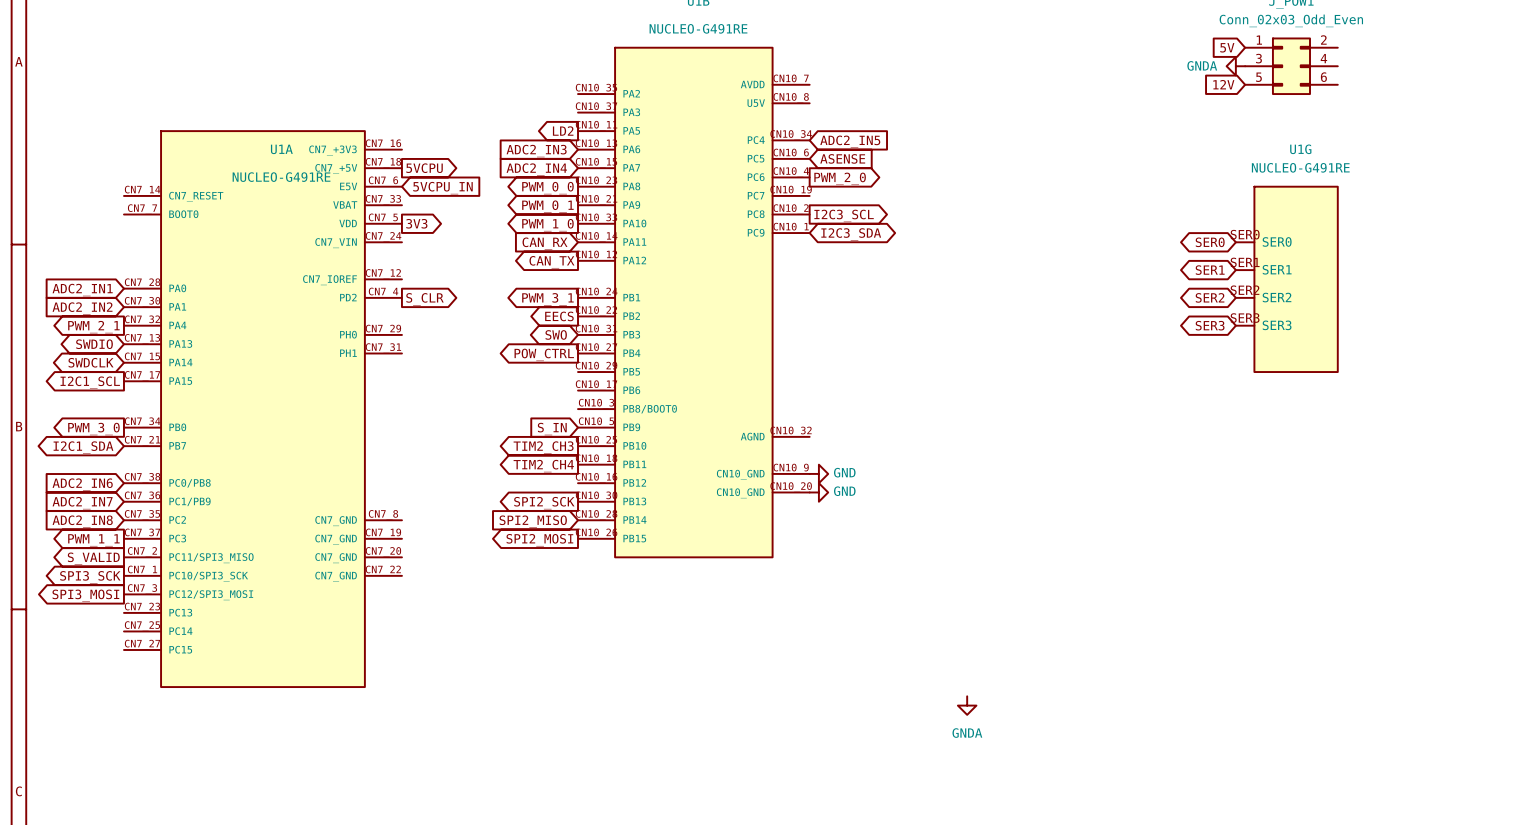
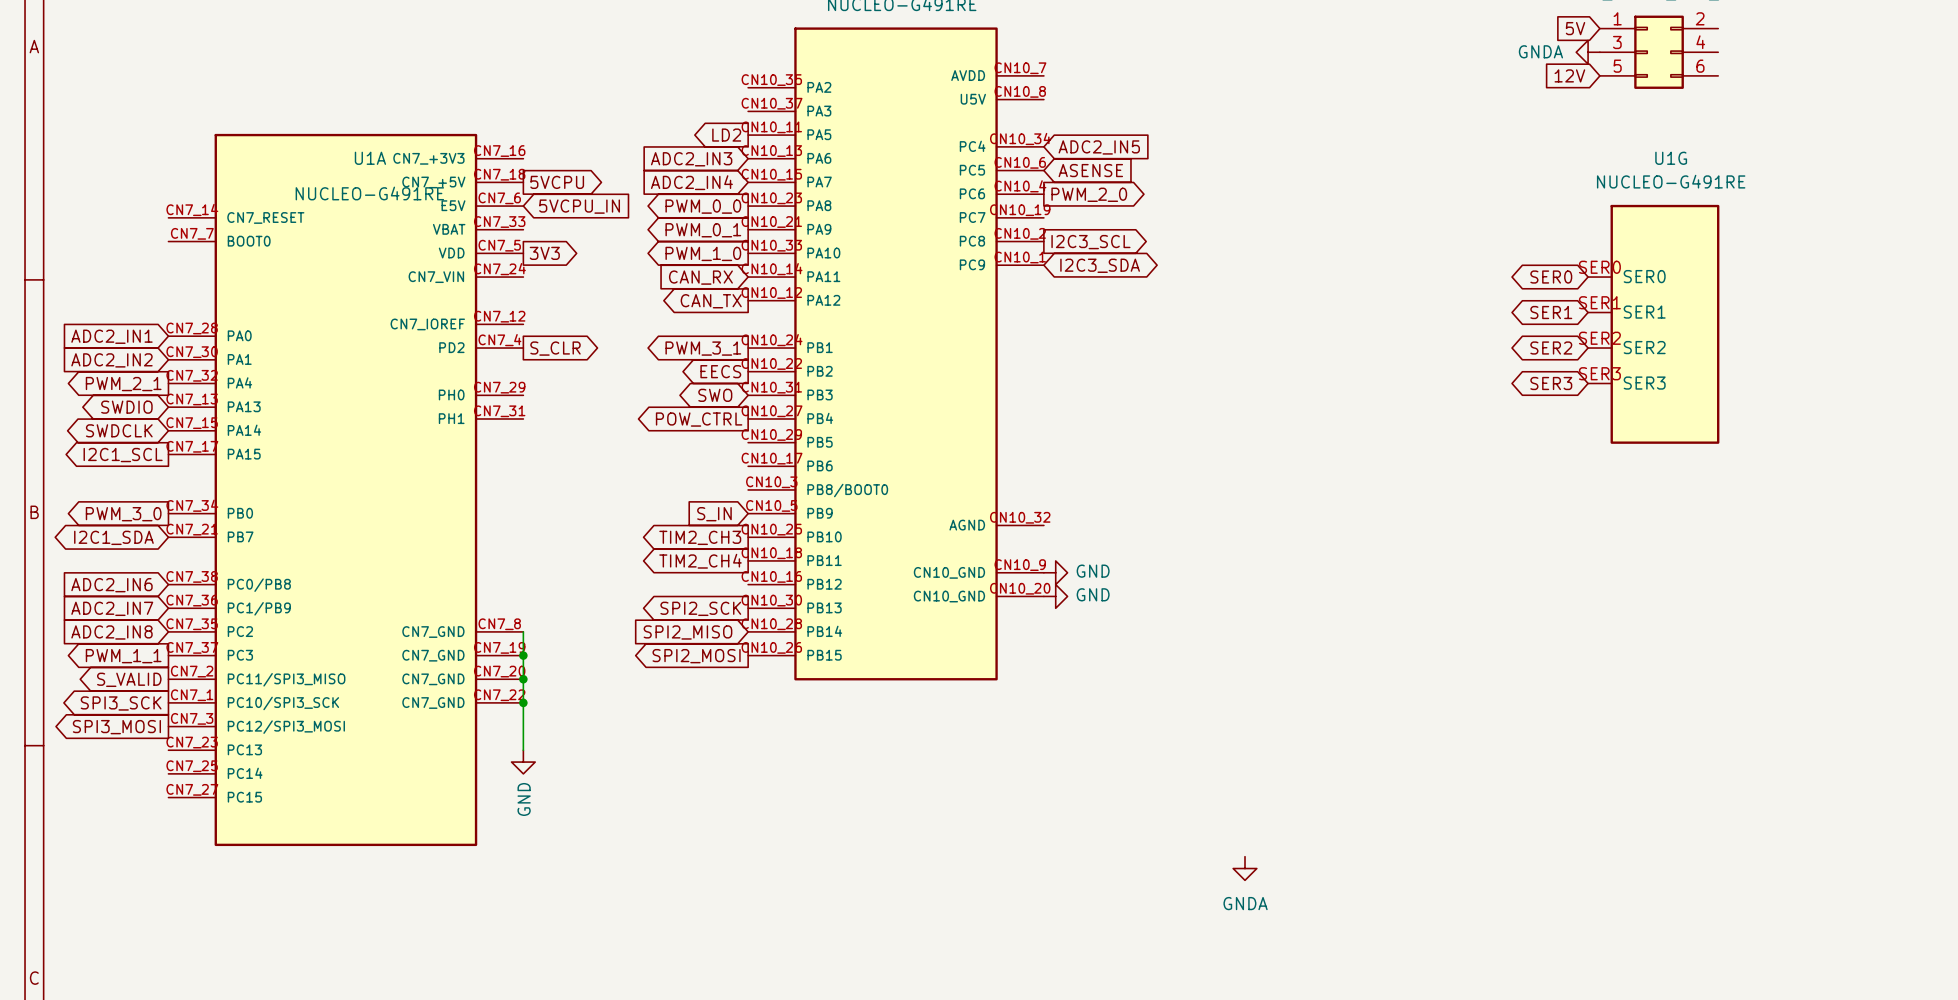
wire: none -> (523, 631) (523, 750)
junction: none -> (523, 655)
junction: none -> (523, 679)
junction: none -> (523, 702)
power symbol: none -> GND (523, 762)

